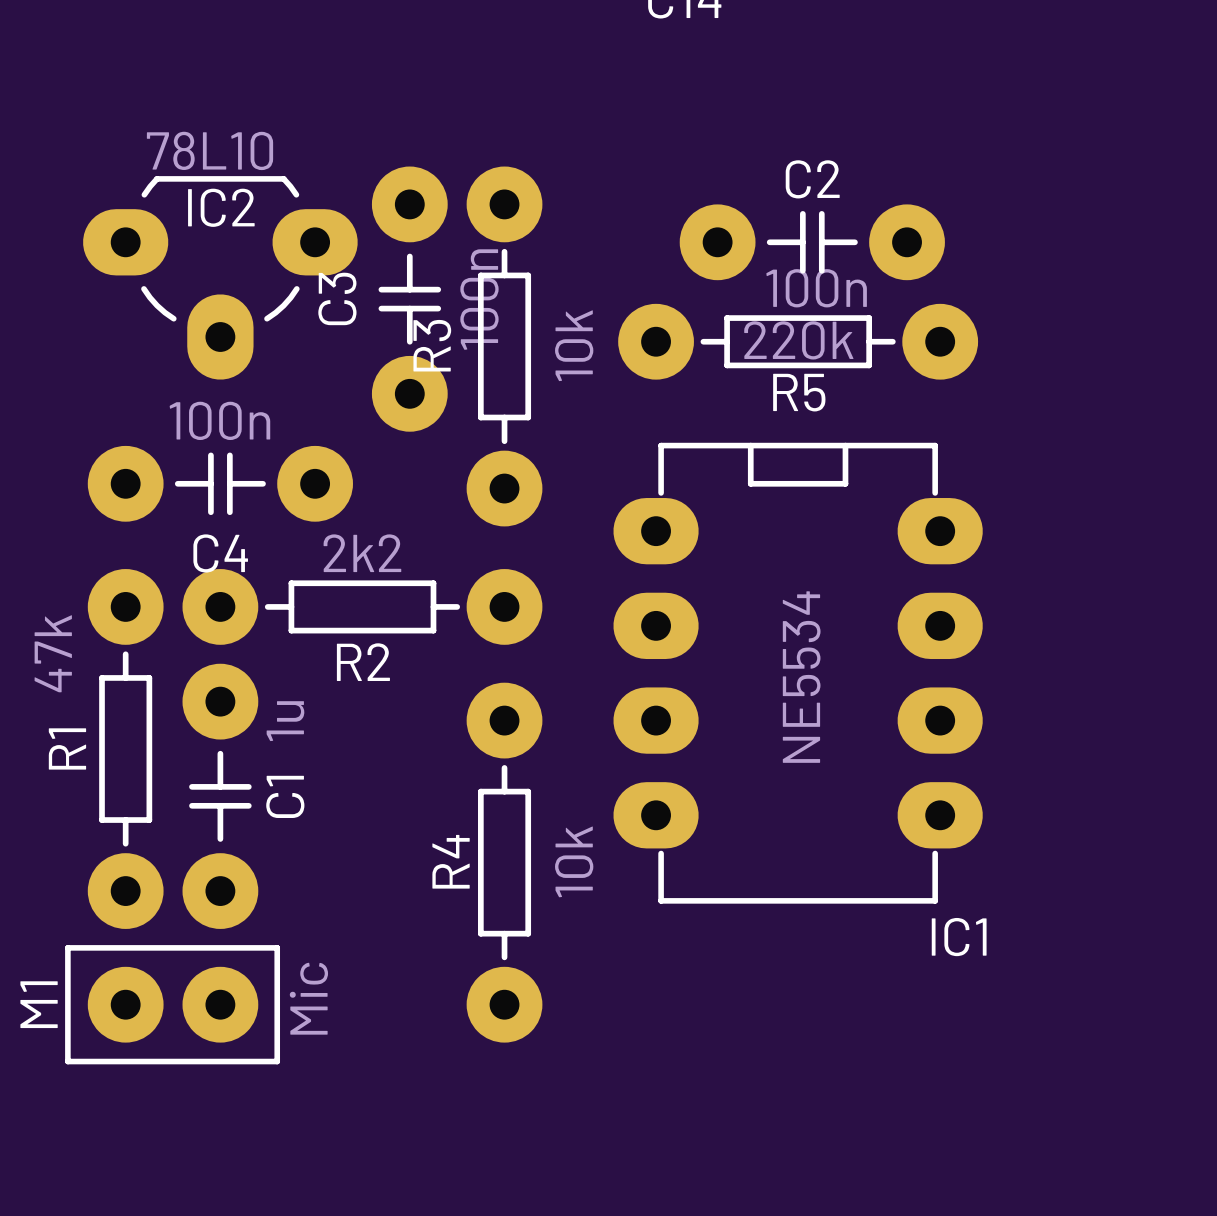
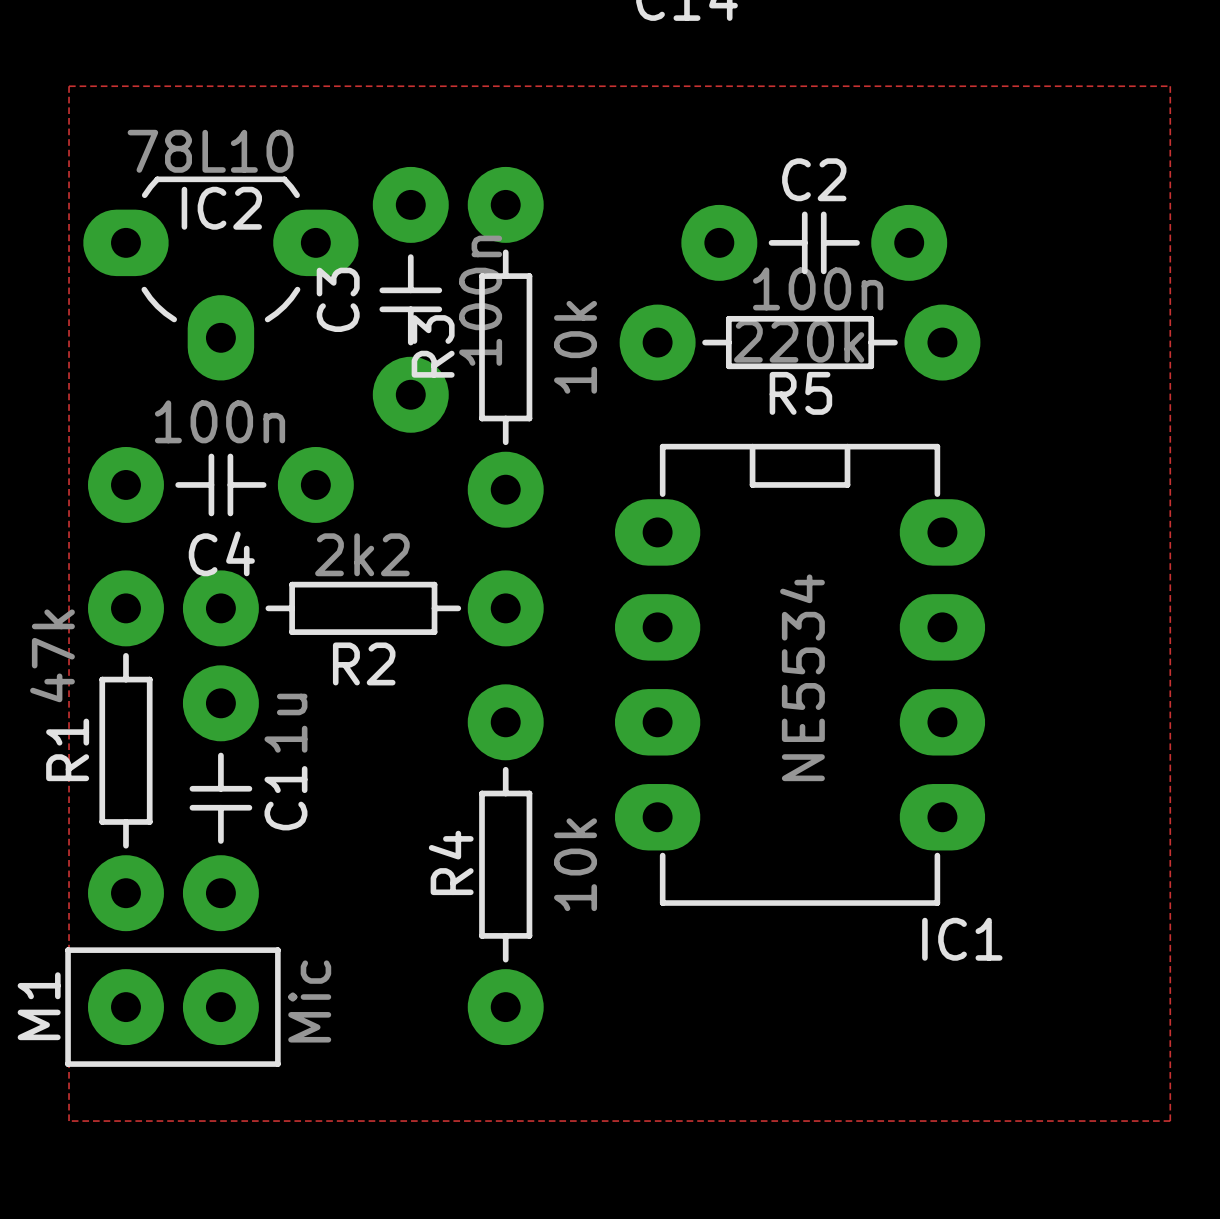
zone outline: none -> (69, 86) (69, 1121) (1170, 1121) (1170, 86) (69, 86)

